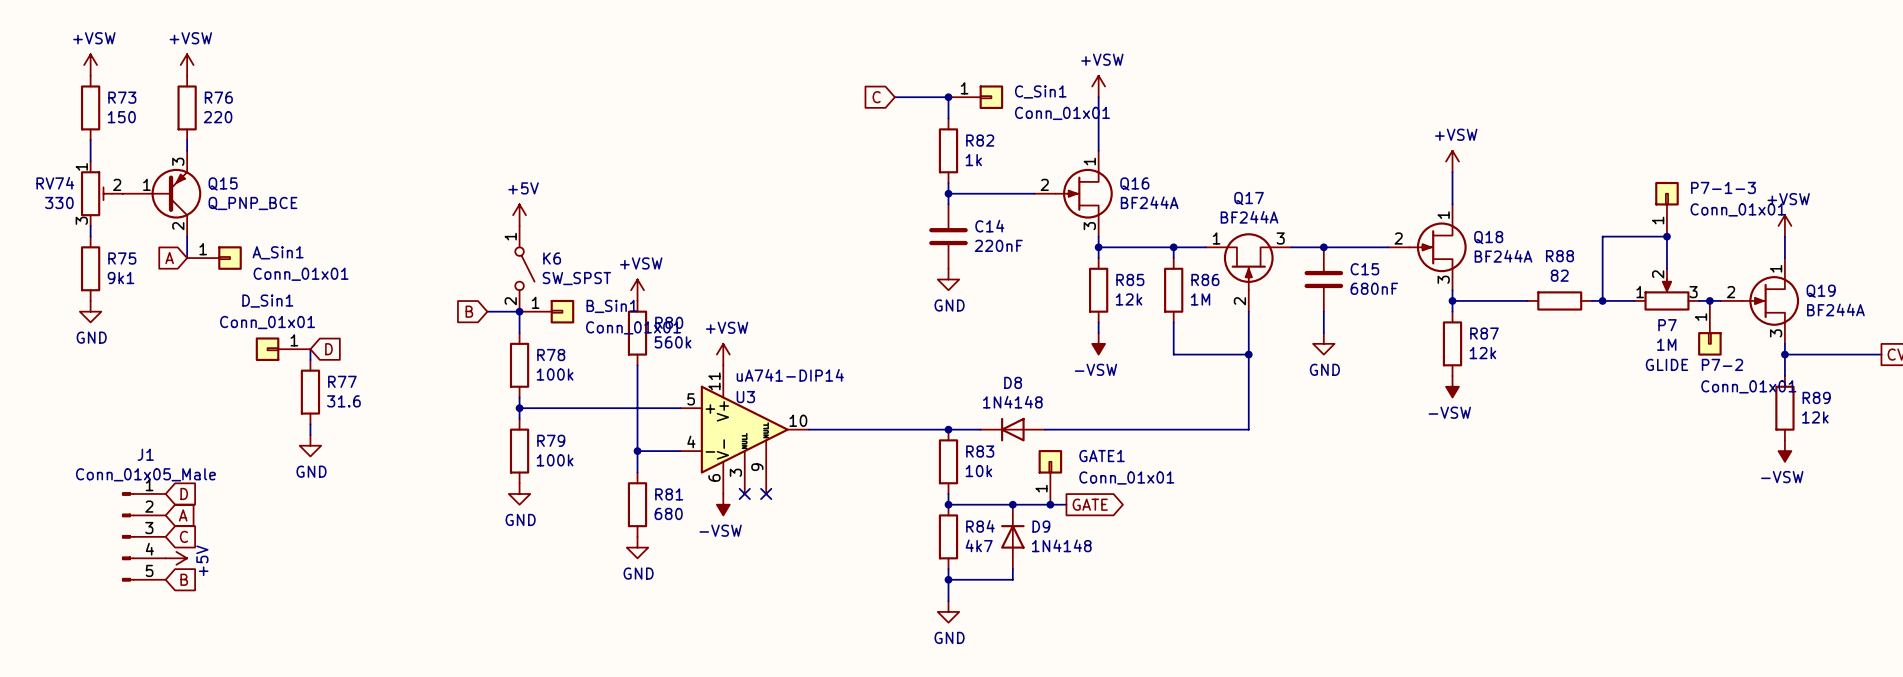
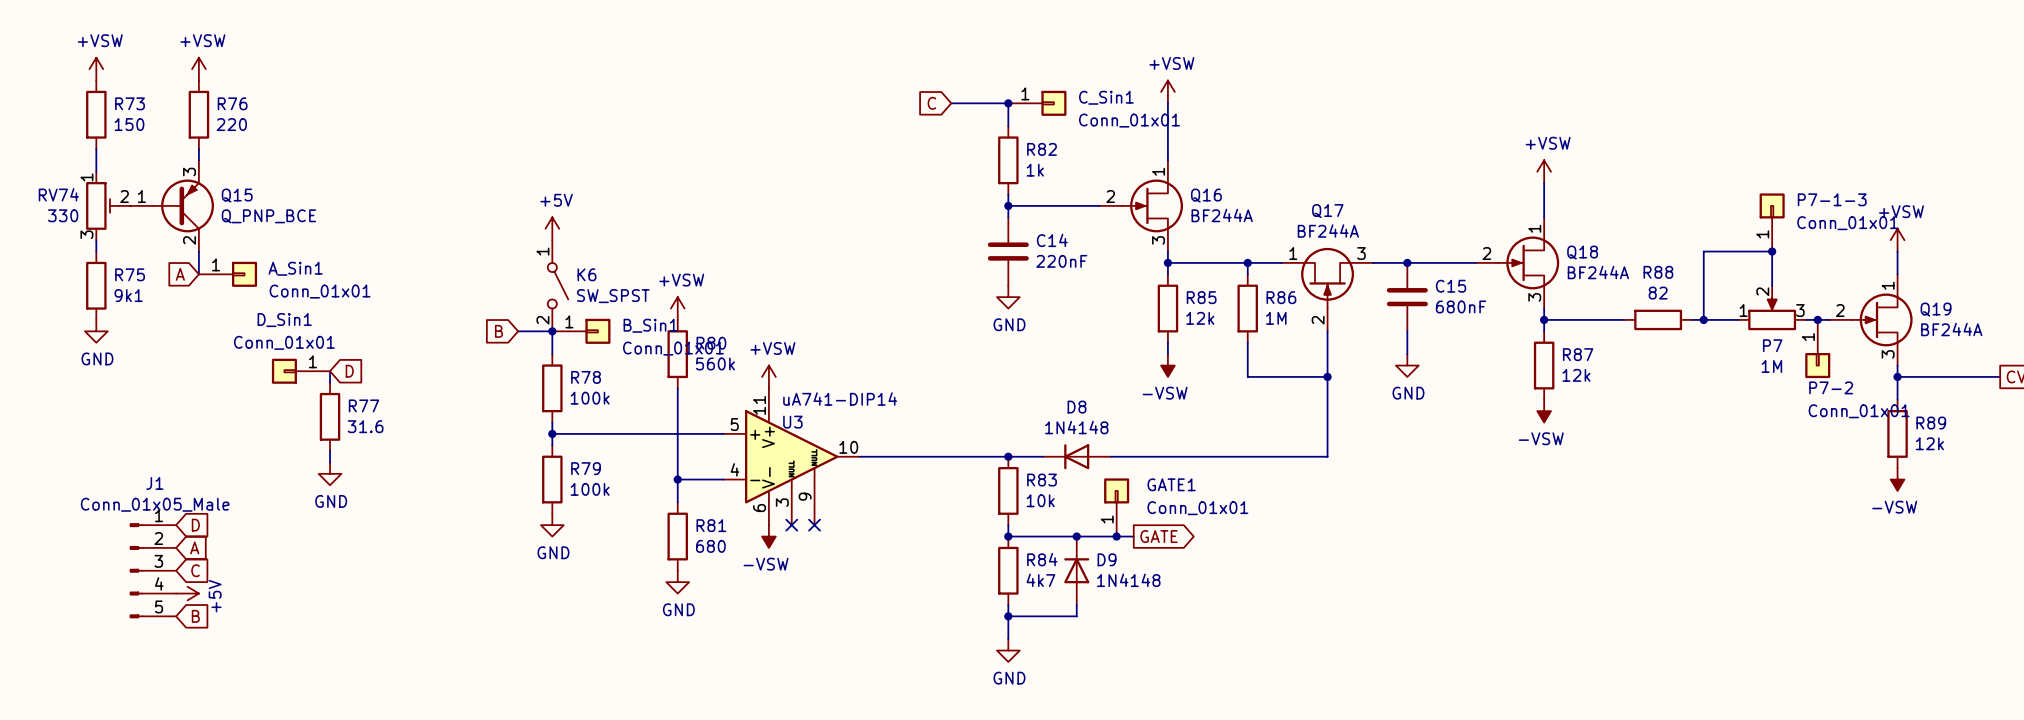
Q15 symbol: [122, 150, 202, 237] -> [130, 160, 214, 252]
P7 text: GLIDE (1666, 364) -> none

